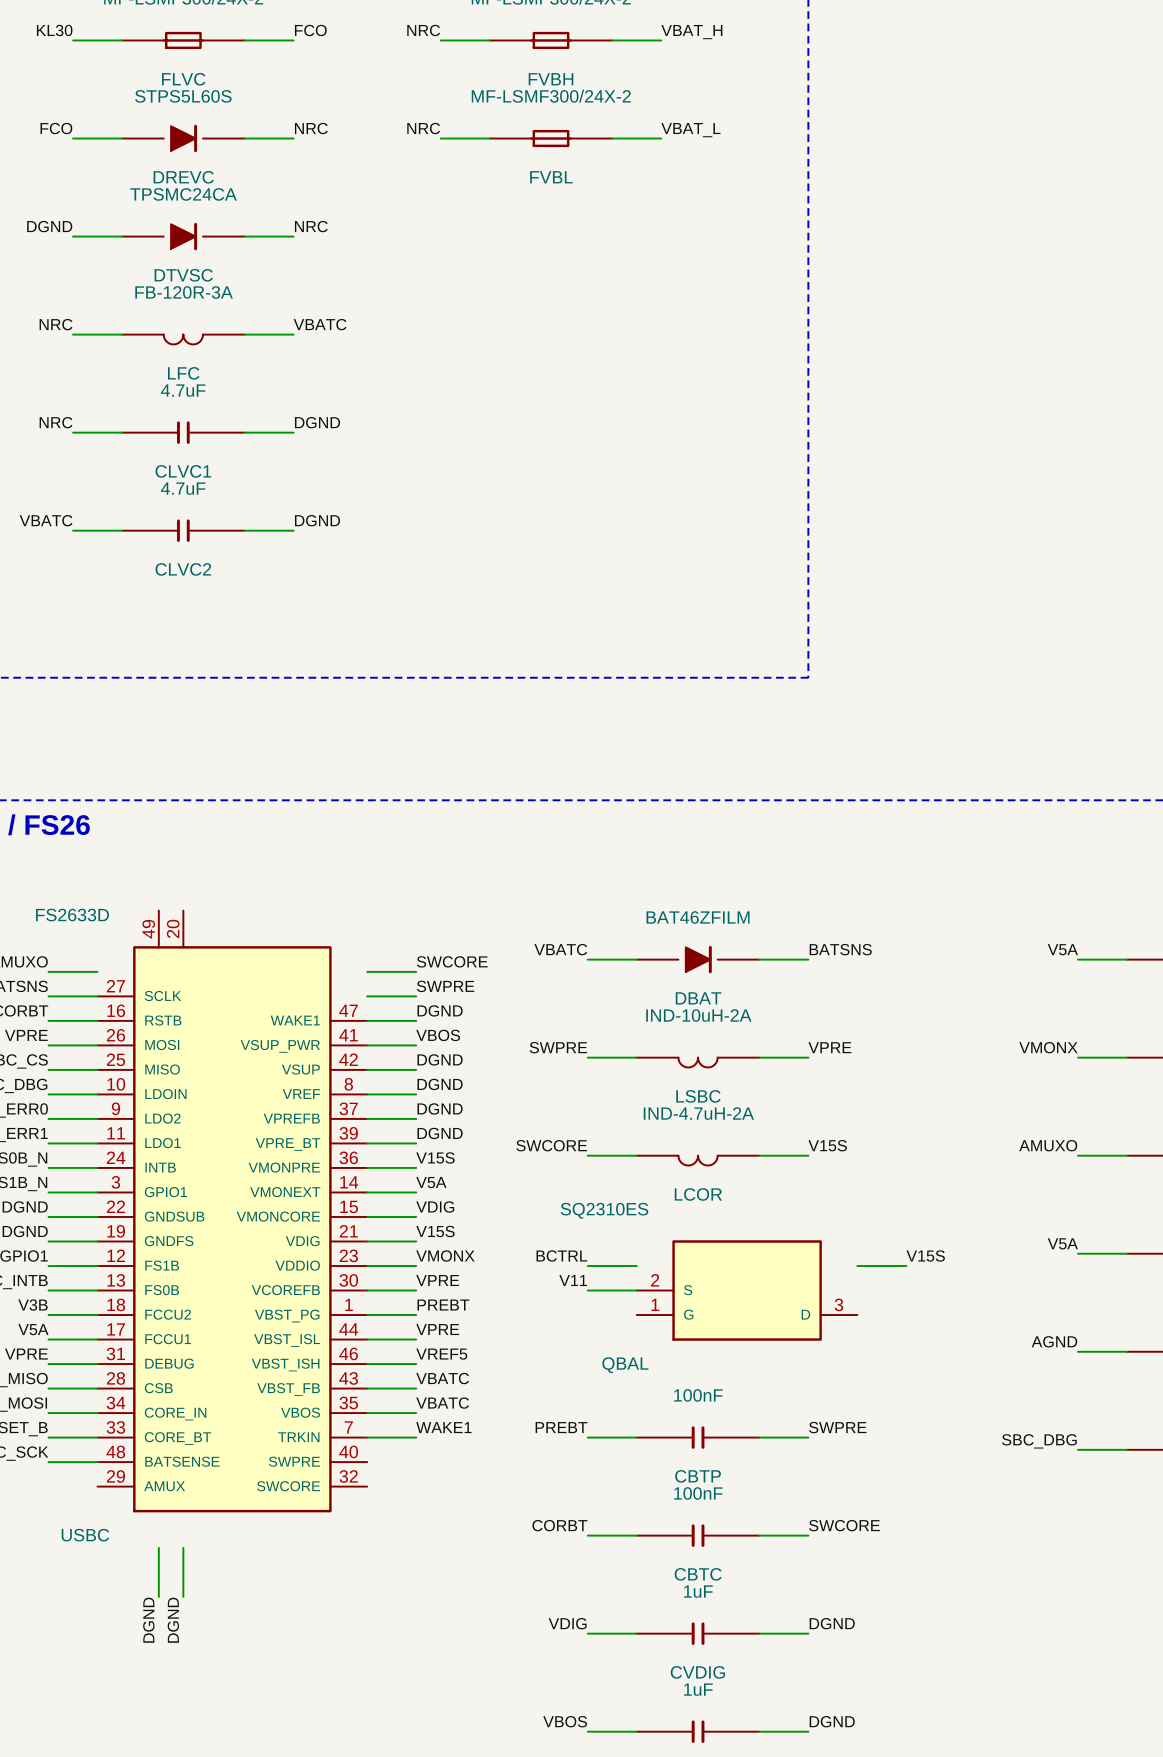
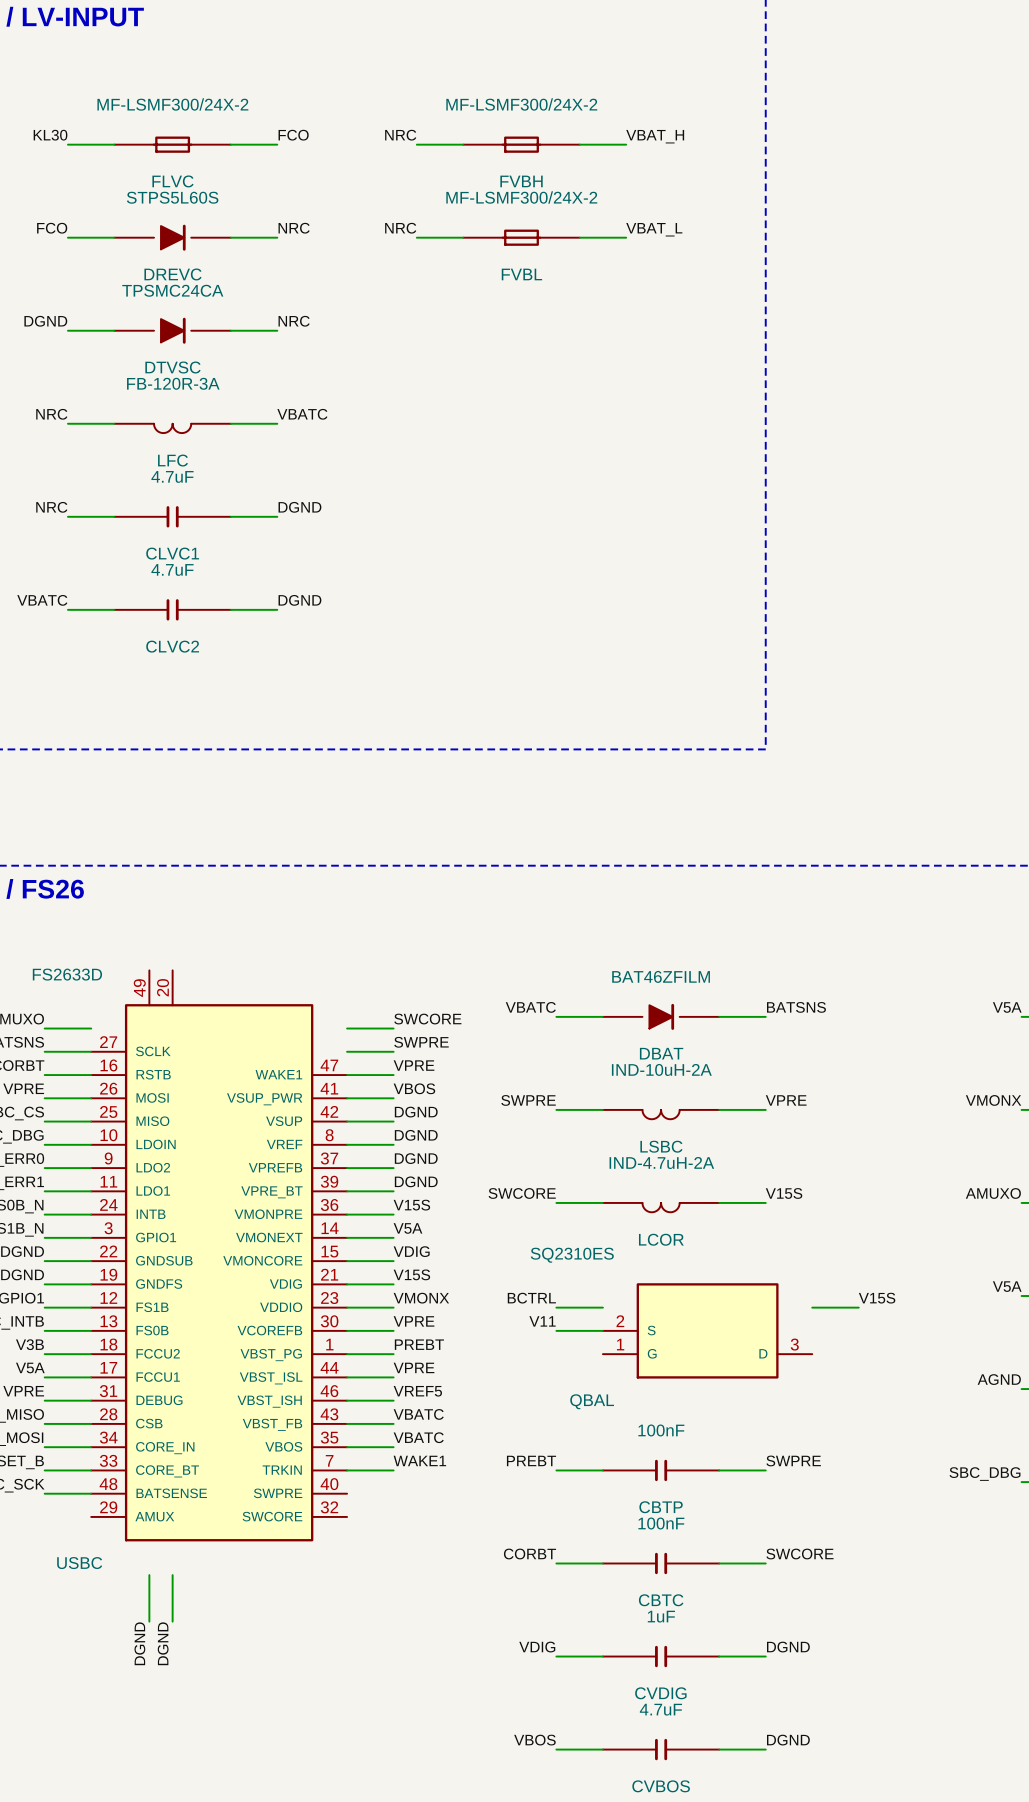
label: DGND (440, 1010) -> VPRE (414, 1065)
CVBOS value: 1uF (698, 1689) -> 4.7uF (660, 1709)

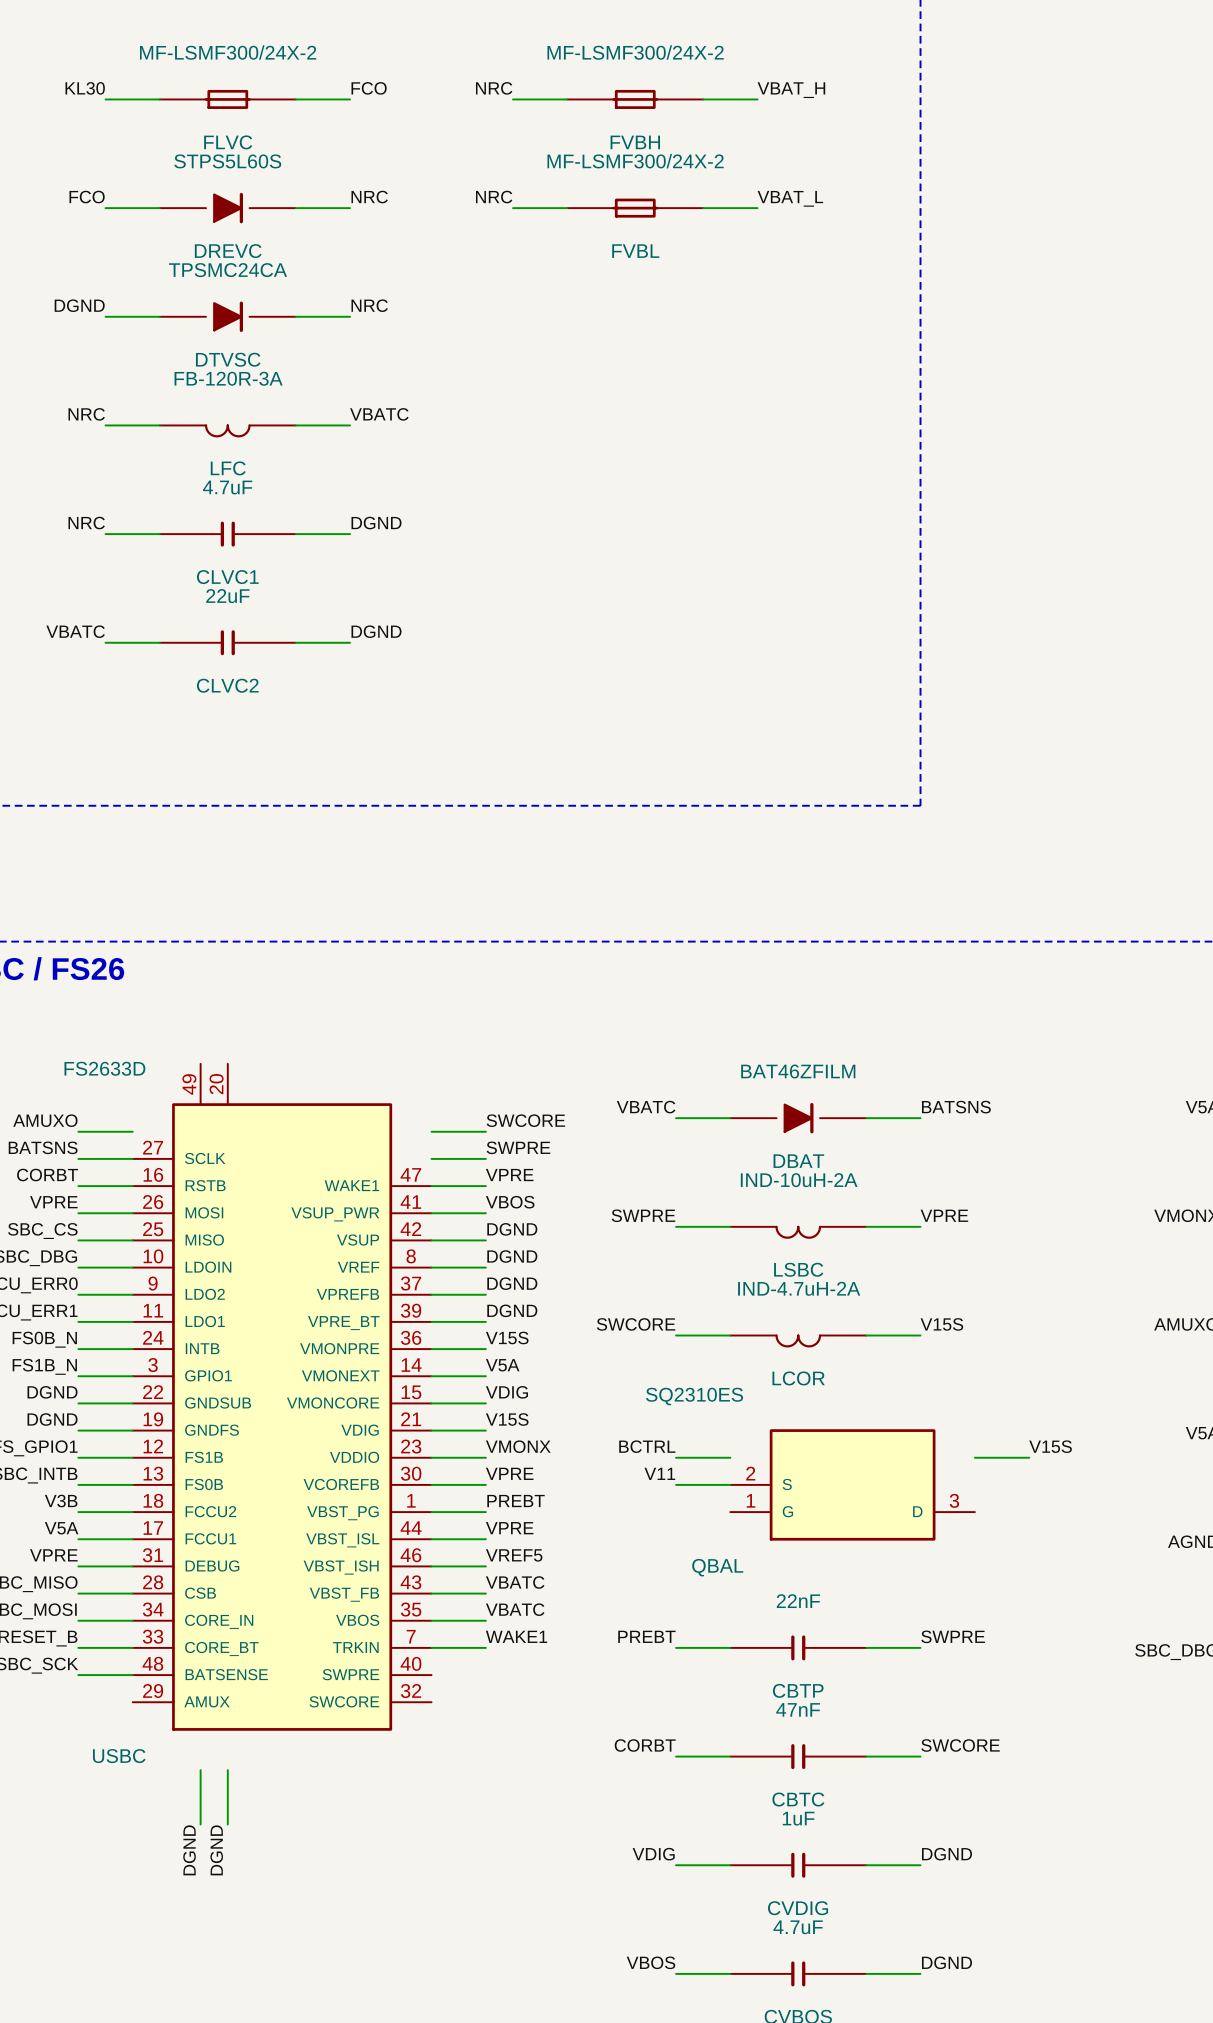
CLVC2 value: 4.7uF (172, 569) -> 22uF (227, 596)
CBTP value: 100nF (661, 1430) -> 22nF (798, 1601)
CBTC value: 100nF (661, 1523) -> 47nF (798, 1709)

